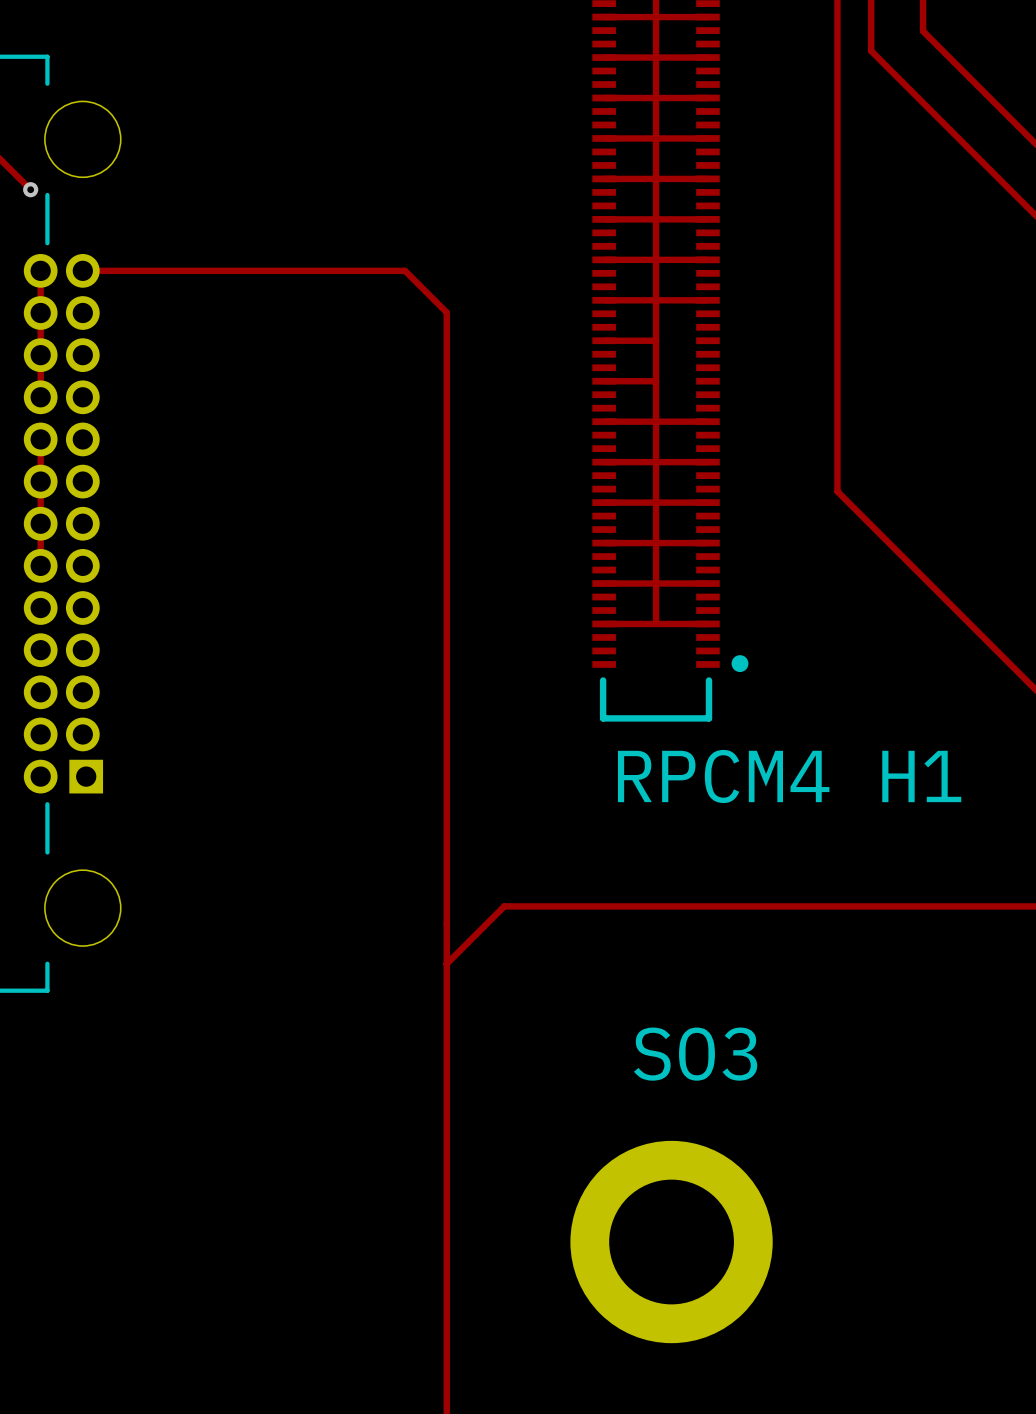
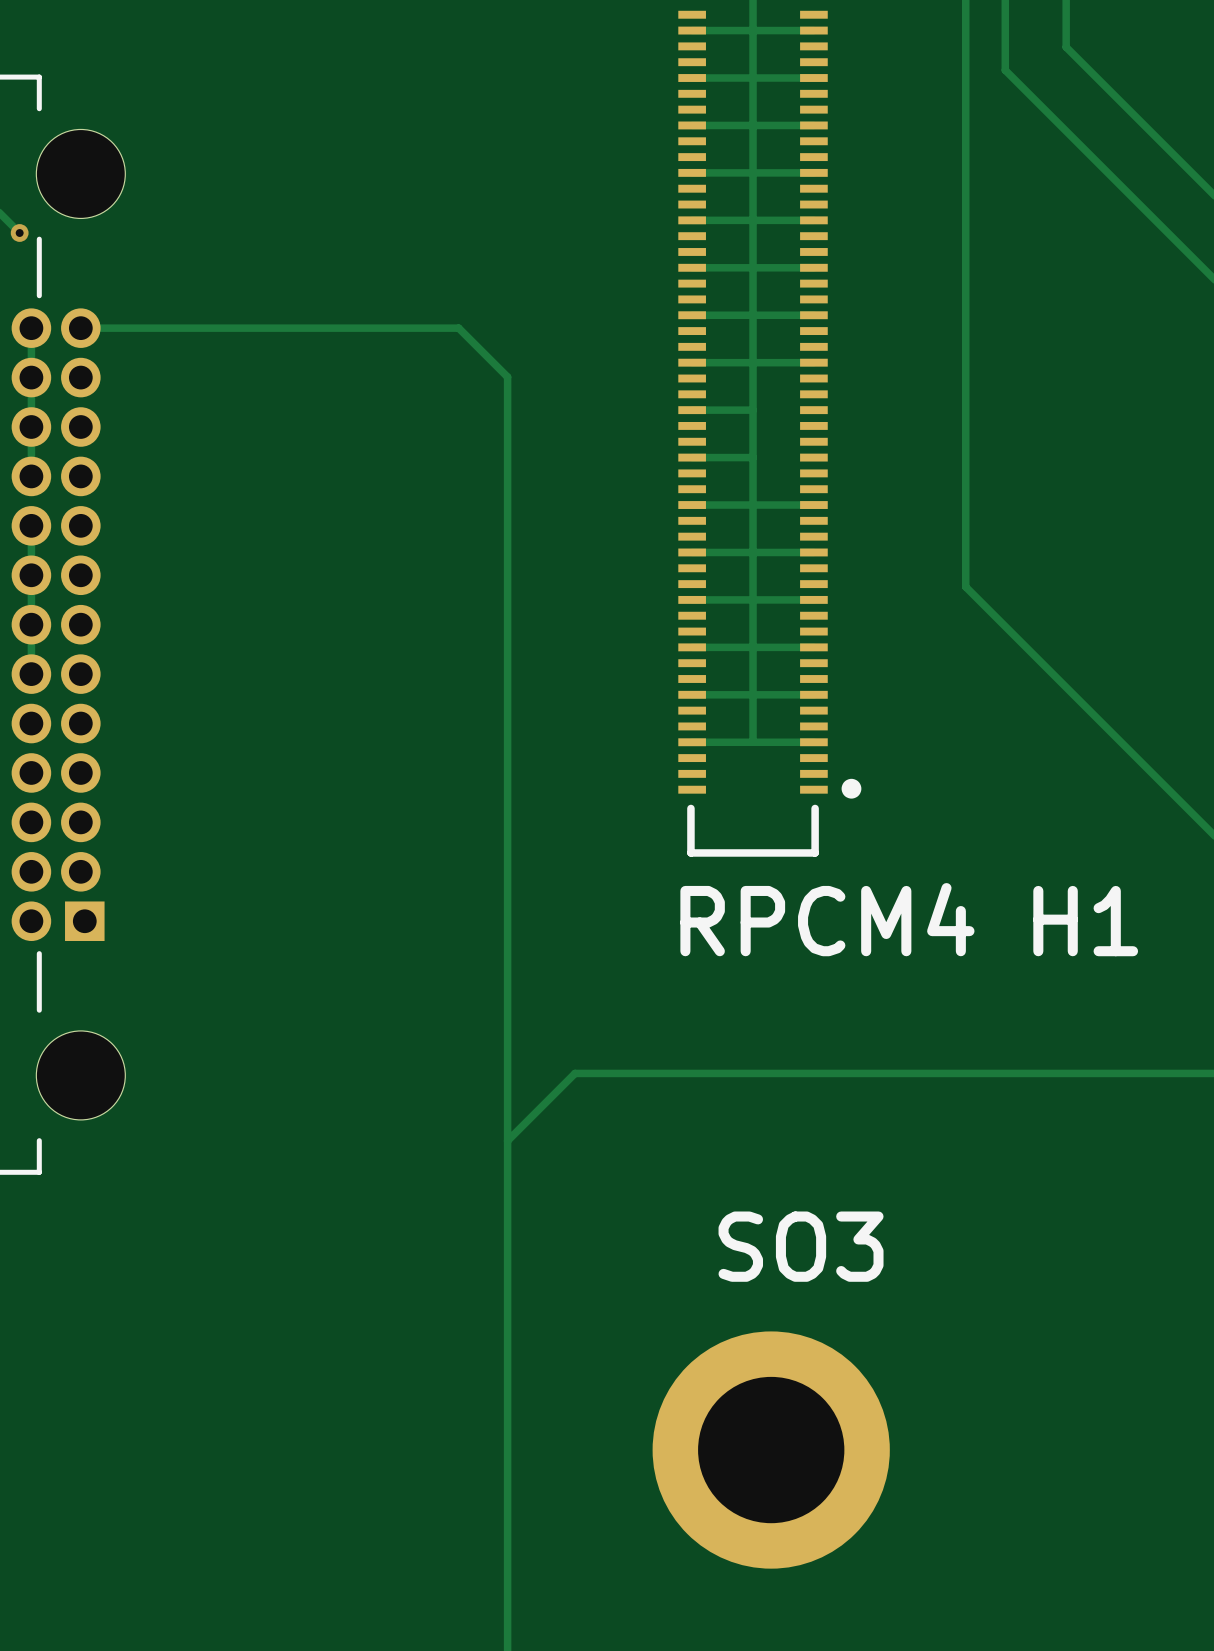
part position: (671, 1242) -> (771, 1450)

